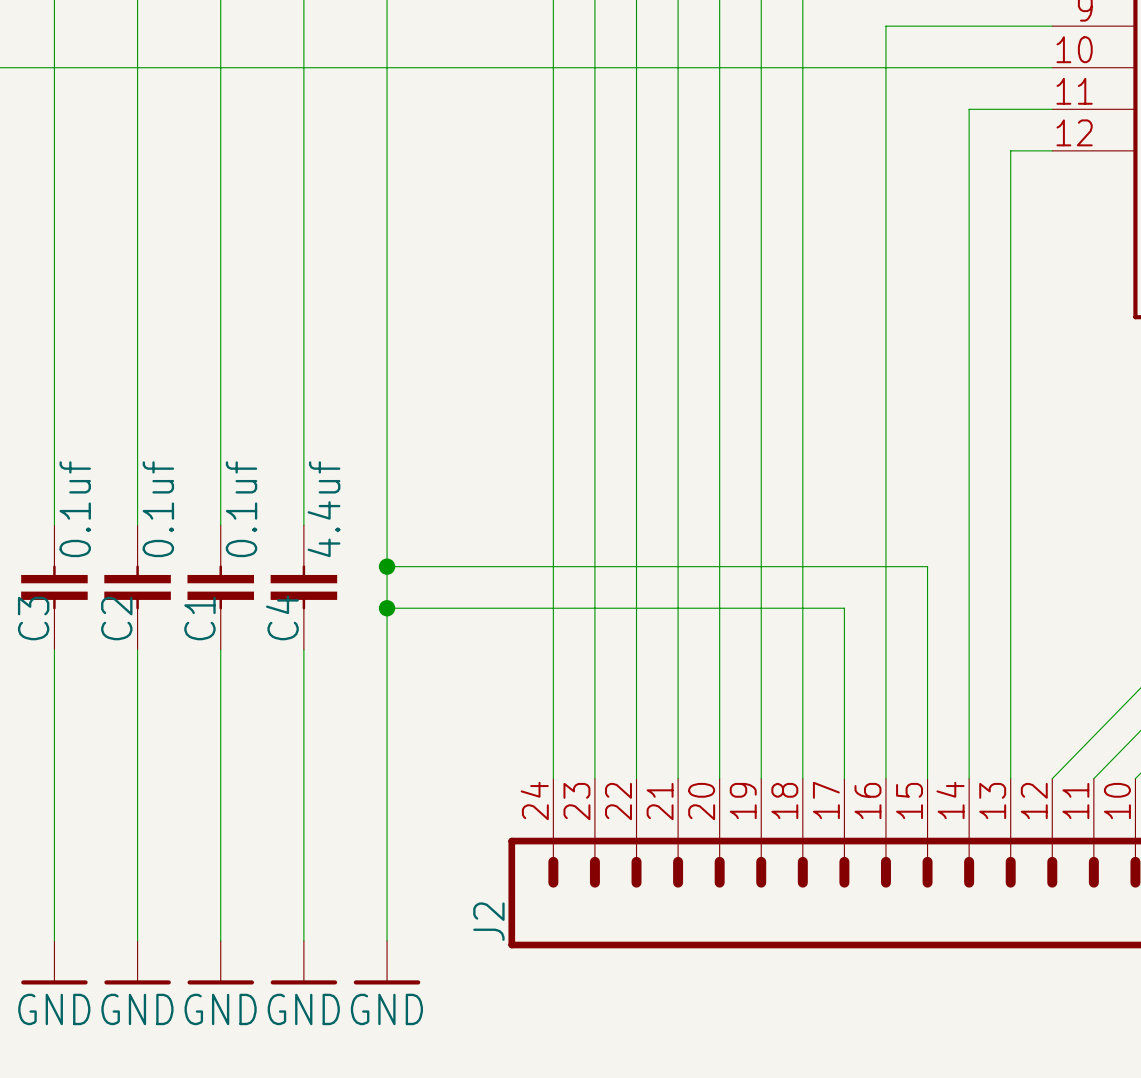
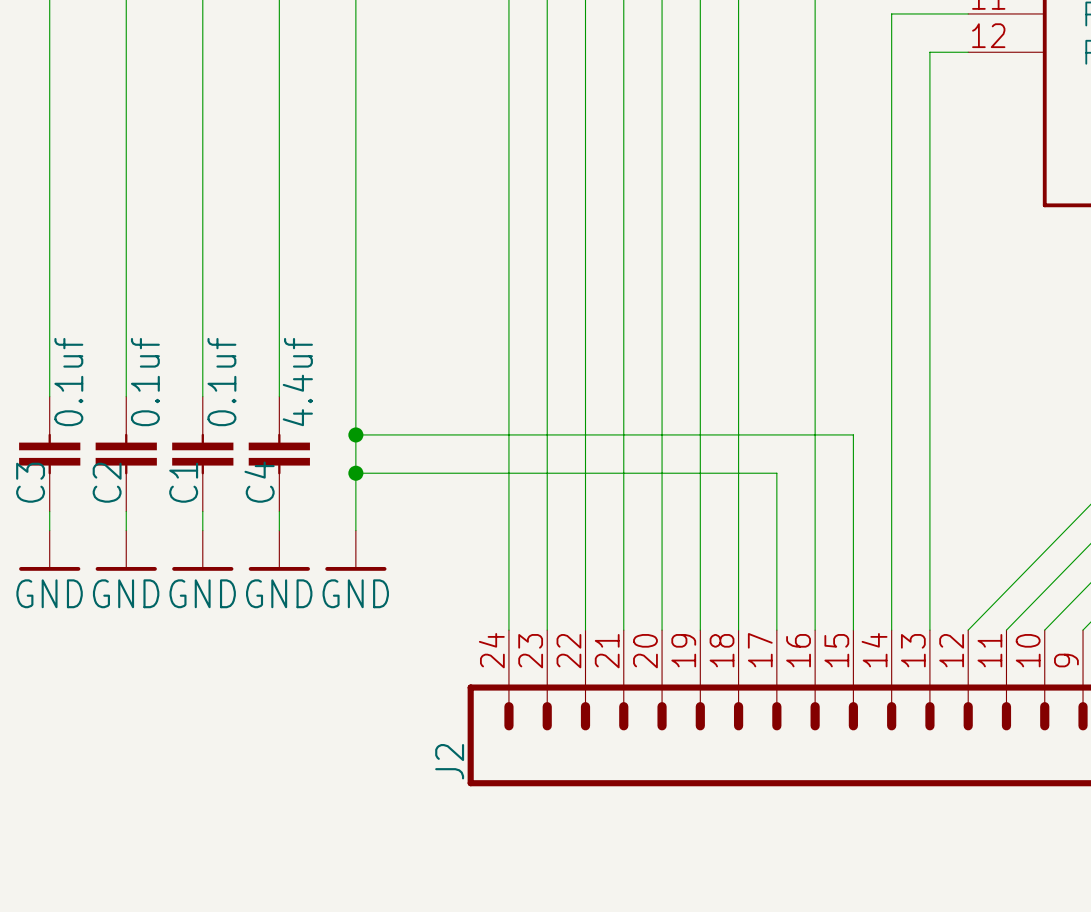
wire: (54, 670) (54, 940) -> none
wire: (137, 670) (137, 940) -> none
wire: (220, 670) (220, 940) -> none
wire: (303, 670) (303, 940) -> none
wire: (387, 670) (387, 940) -> none
power symbol: none -> GND (49, 550)
power symbol: none -> GND (126, 550)
power symbol: none -> GND (202, 550)
power symbol: none -> GND (279, 550)
power symbol: none -> GND (355, 550)
power symbol: GND (54, 962) -> none
power symbol: GND (137, 962) -> none
power symbol: GND (220, 962) -> none
power symbol: GND (303, 962) -> none
power symbol: GND (387, 962) -> none

